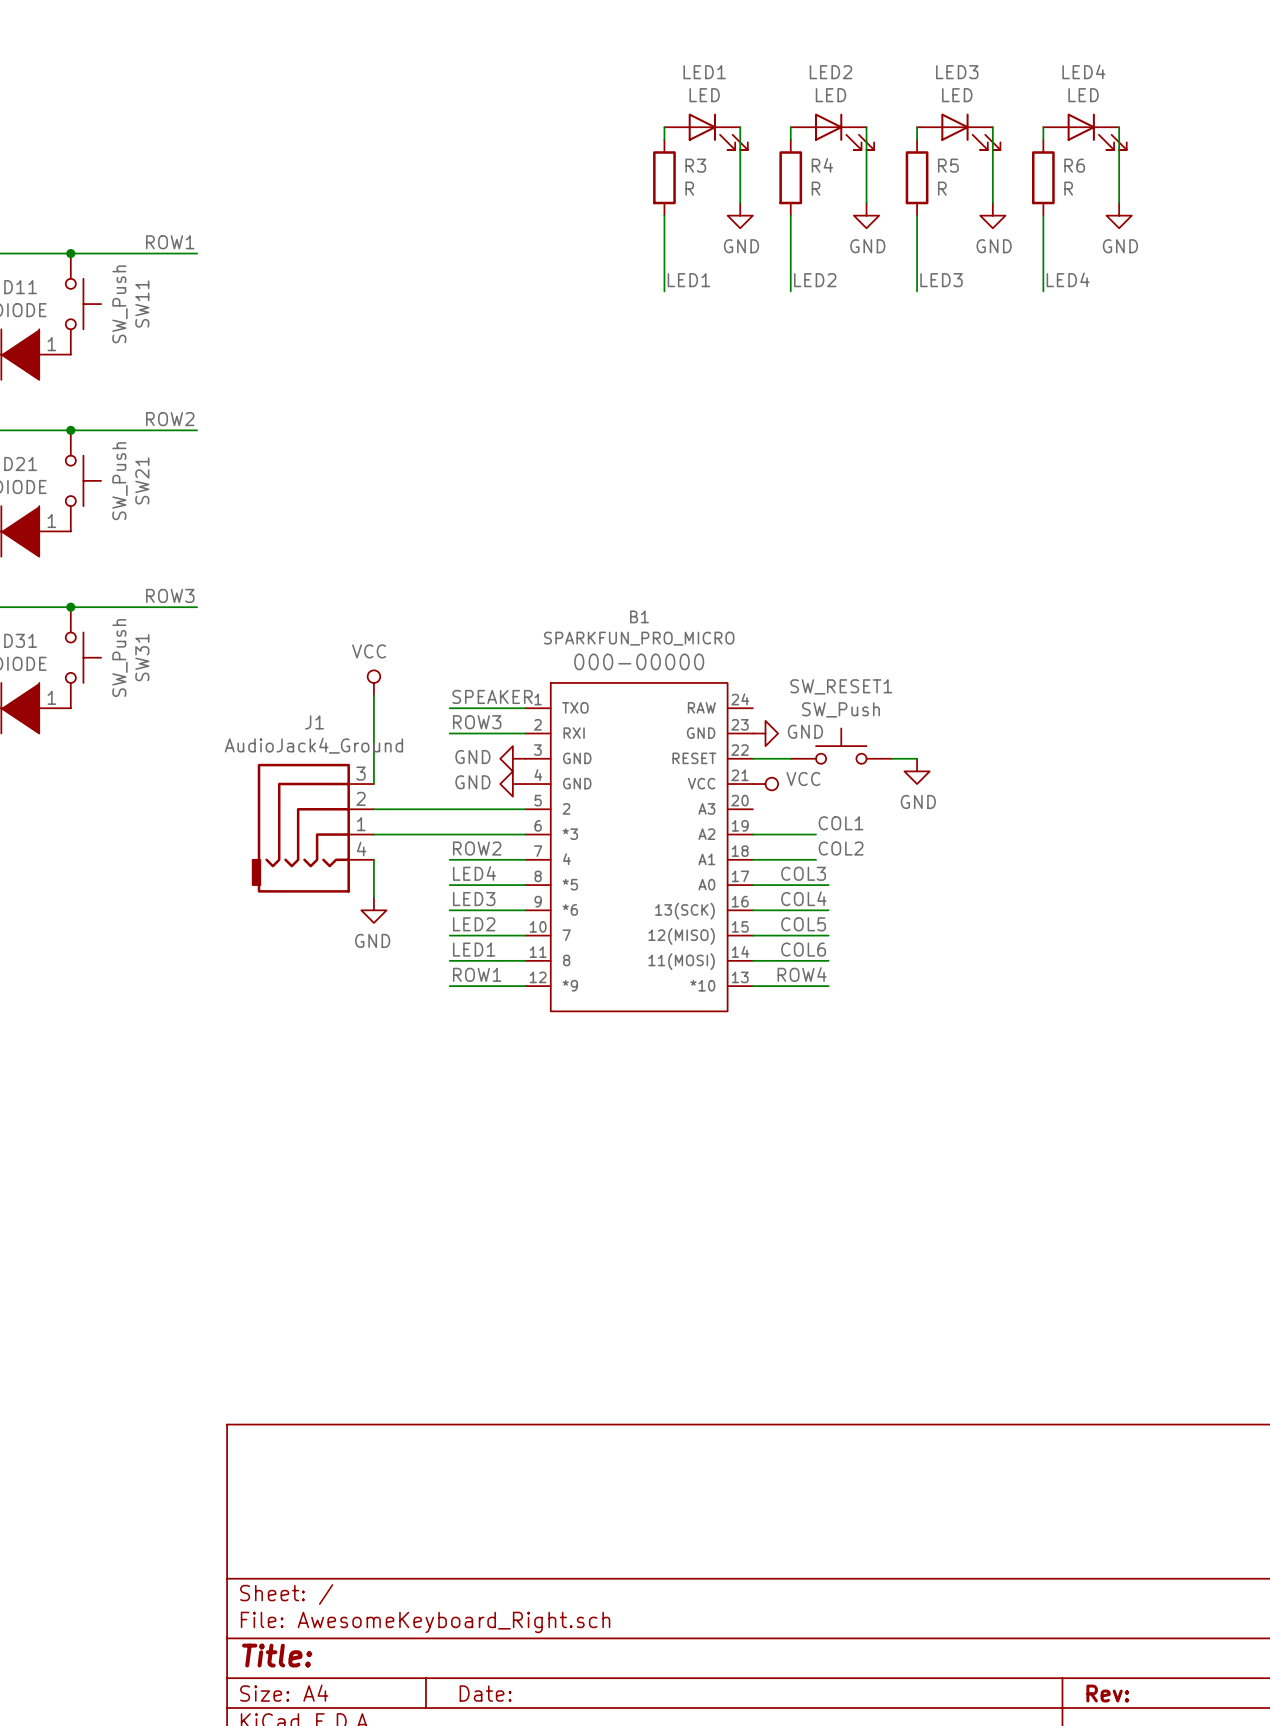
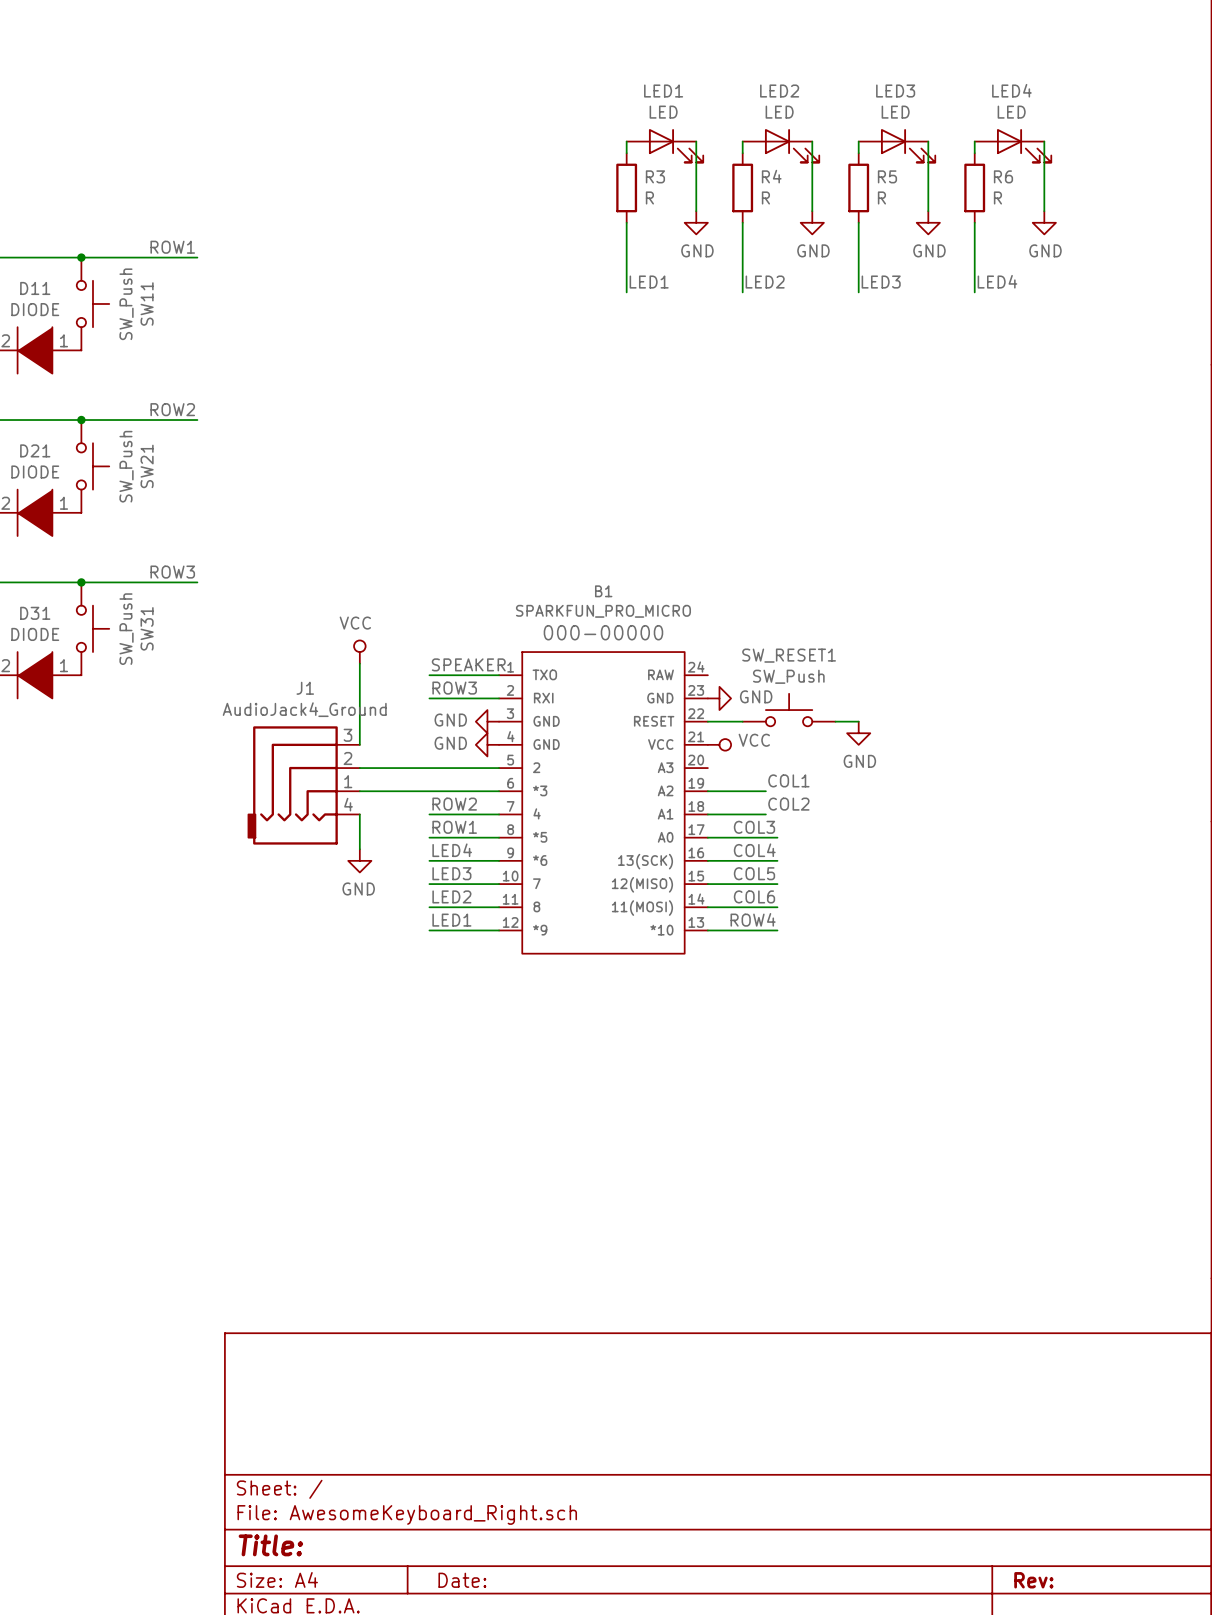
label: LED4 (474, 873) -> ROW1 (454, 827)
label: LED3 (474, 899) -> LED4 (452, 850)
label: LED2 (474, 924) -> LED3 (451, 873)
label: LED1 (474, 949) -> LED2 (451, 896)
label: ROW1 (477, 974) -> LED1 (451, 920)

